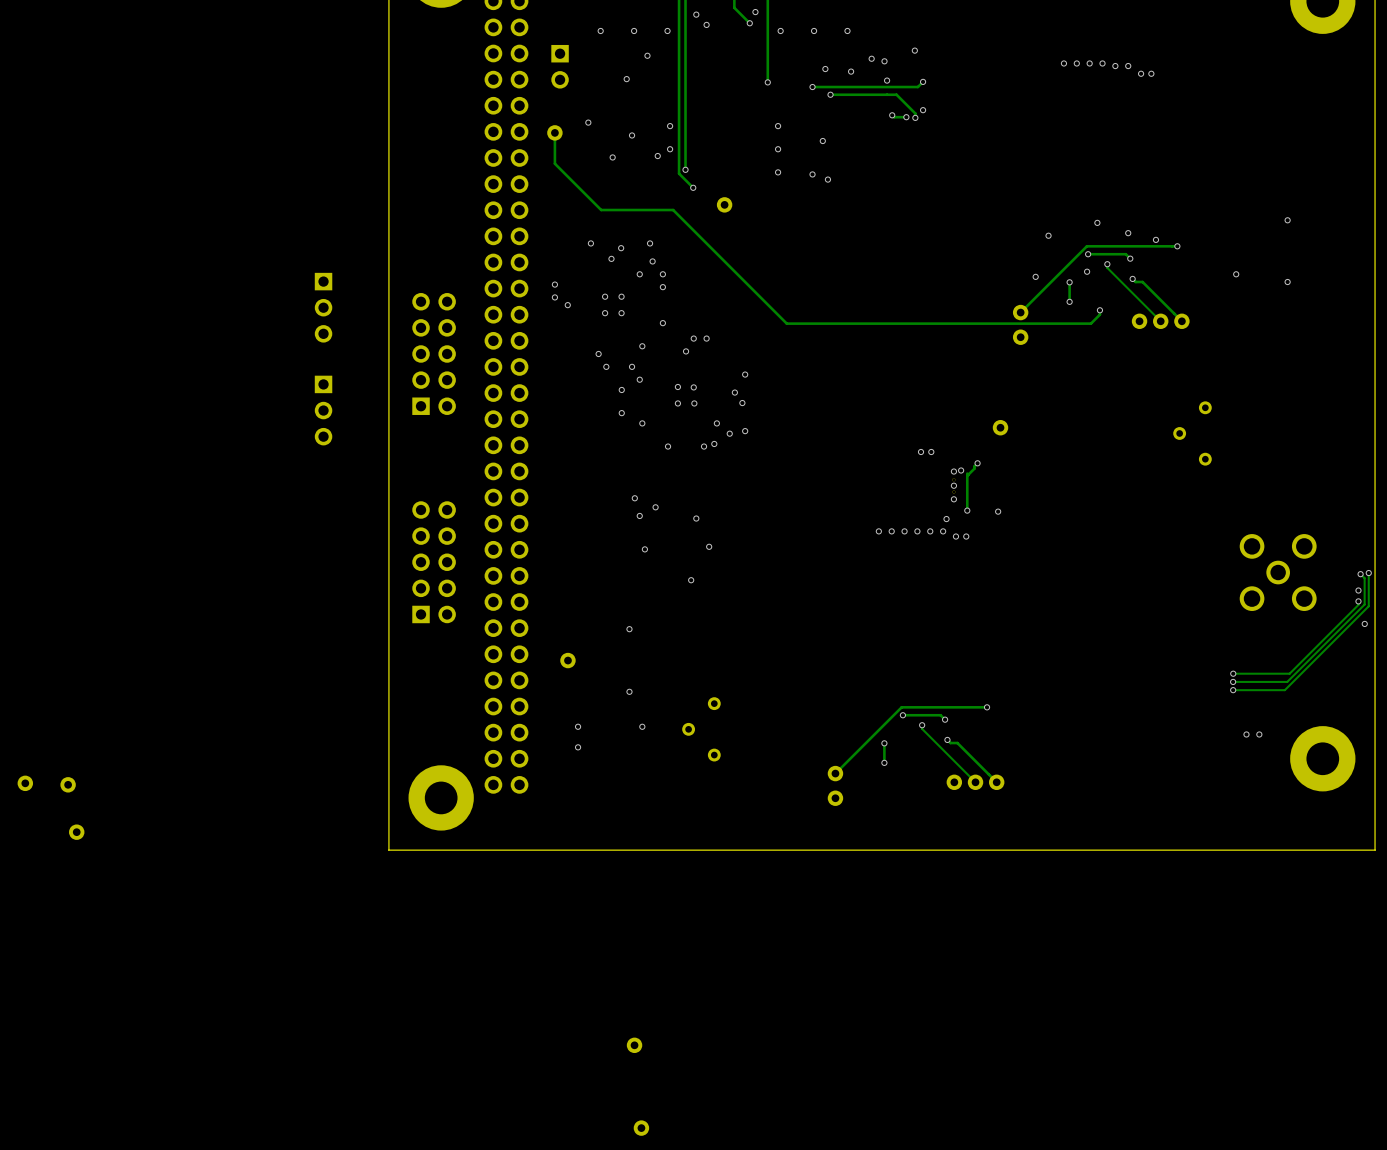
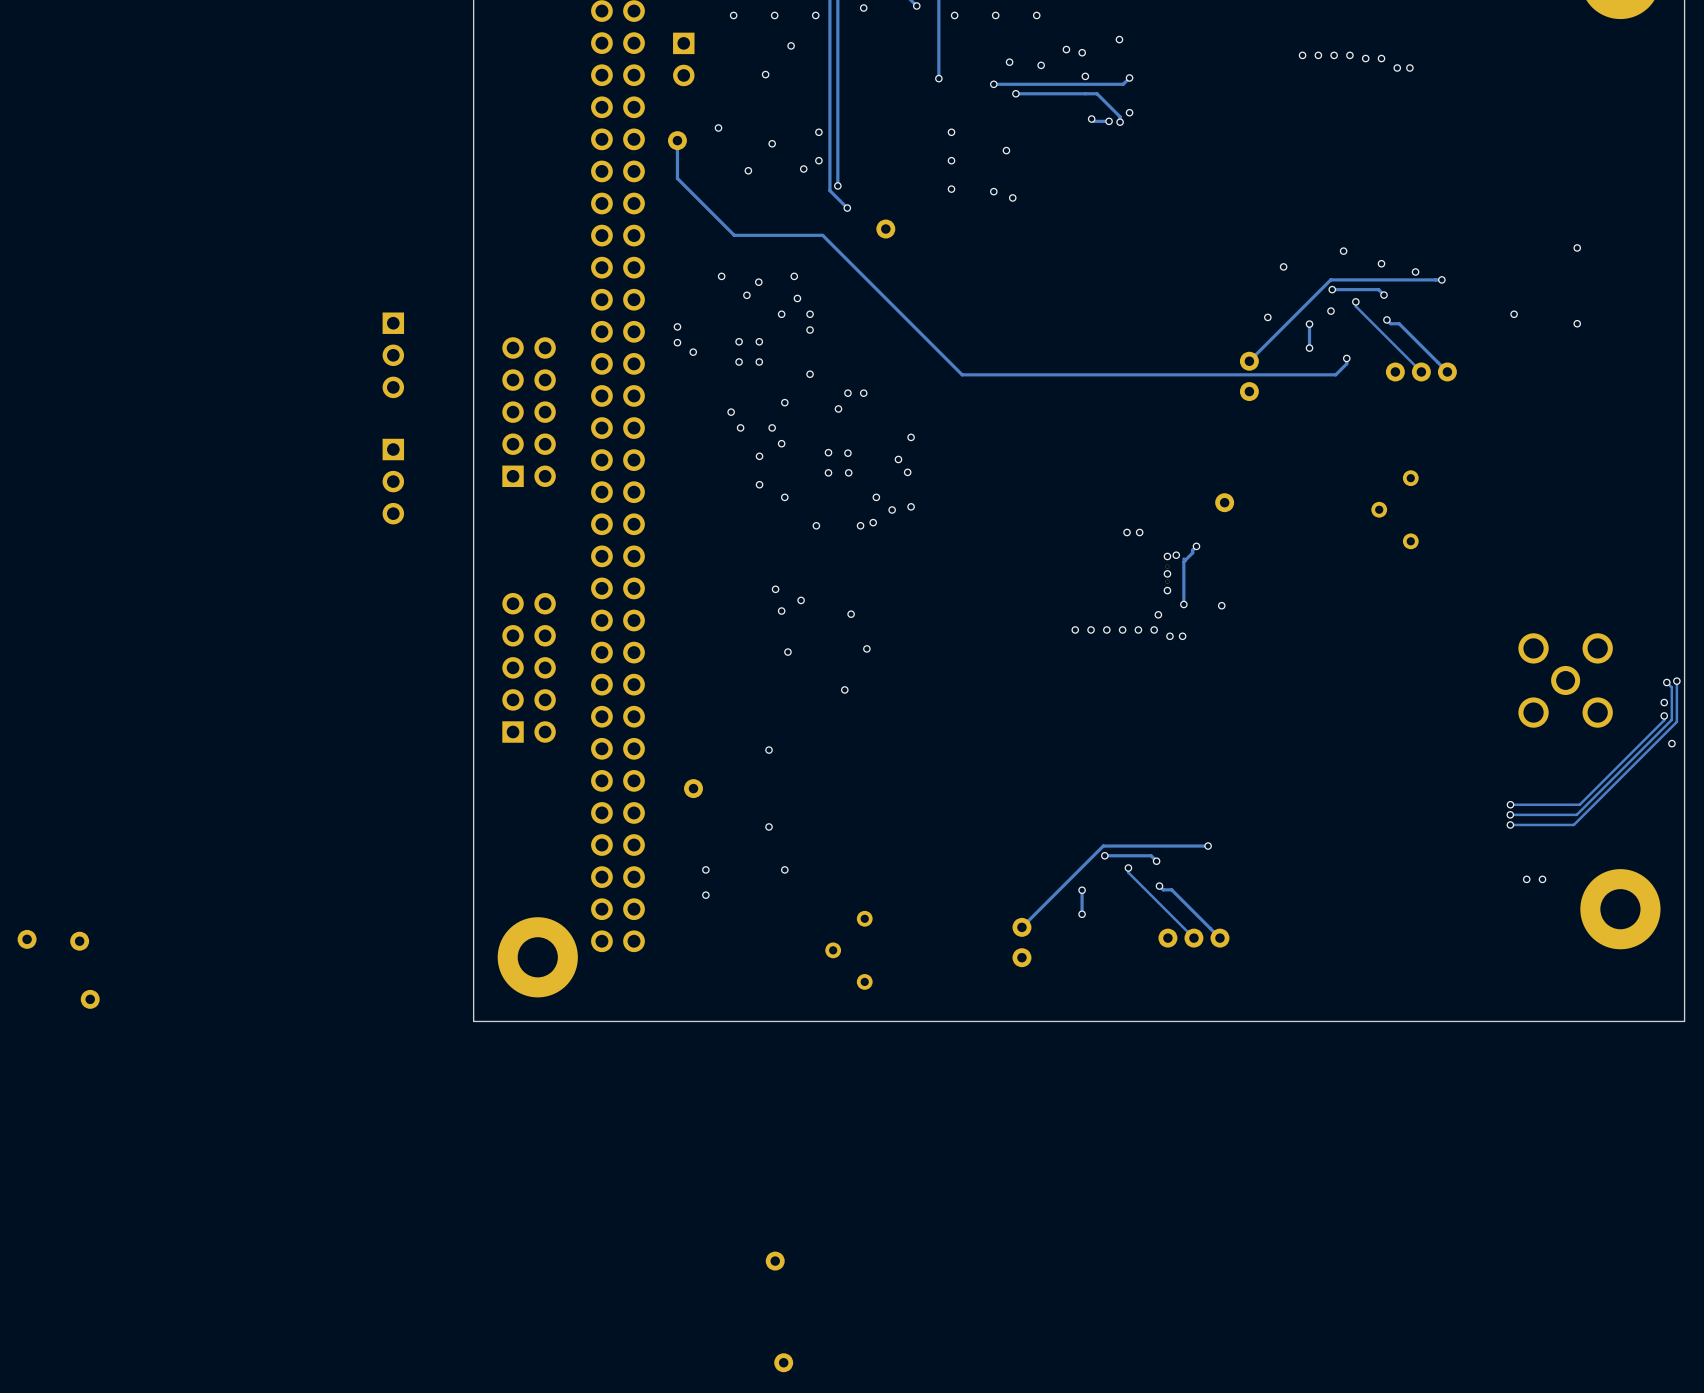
part position: (1192, 433) -> (1395, 509)
part position: (701, 729) -> (848, 950)

